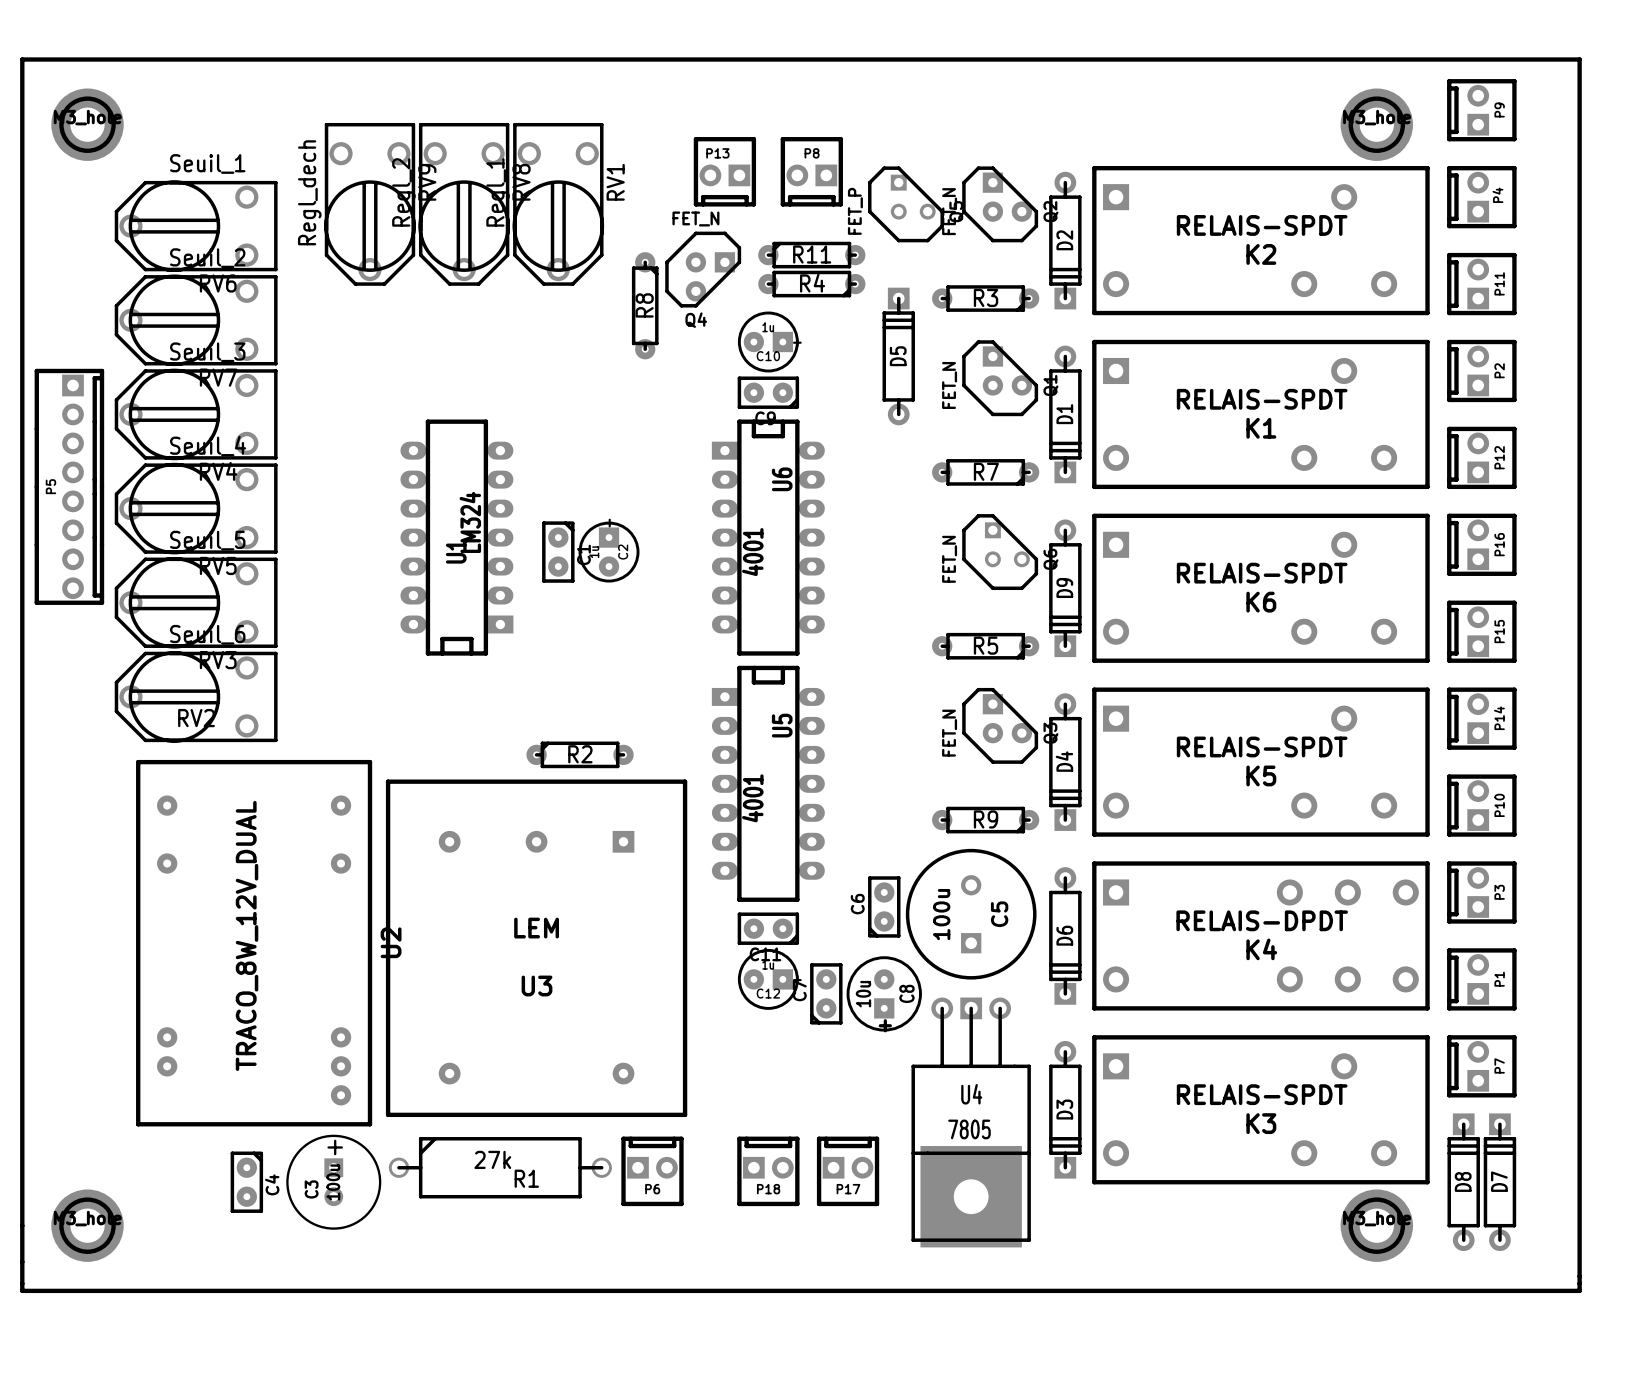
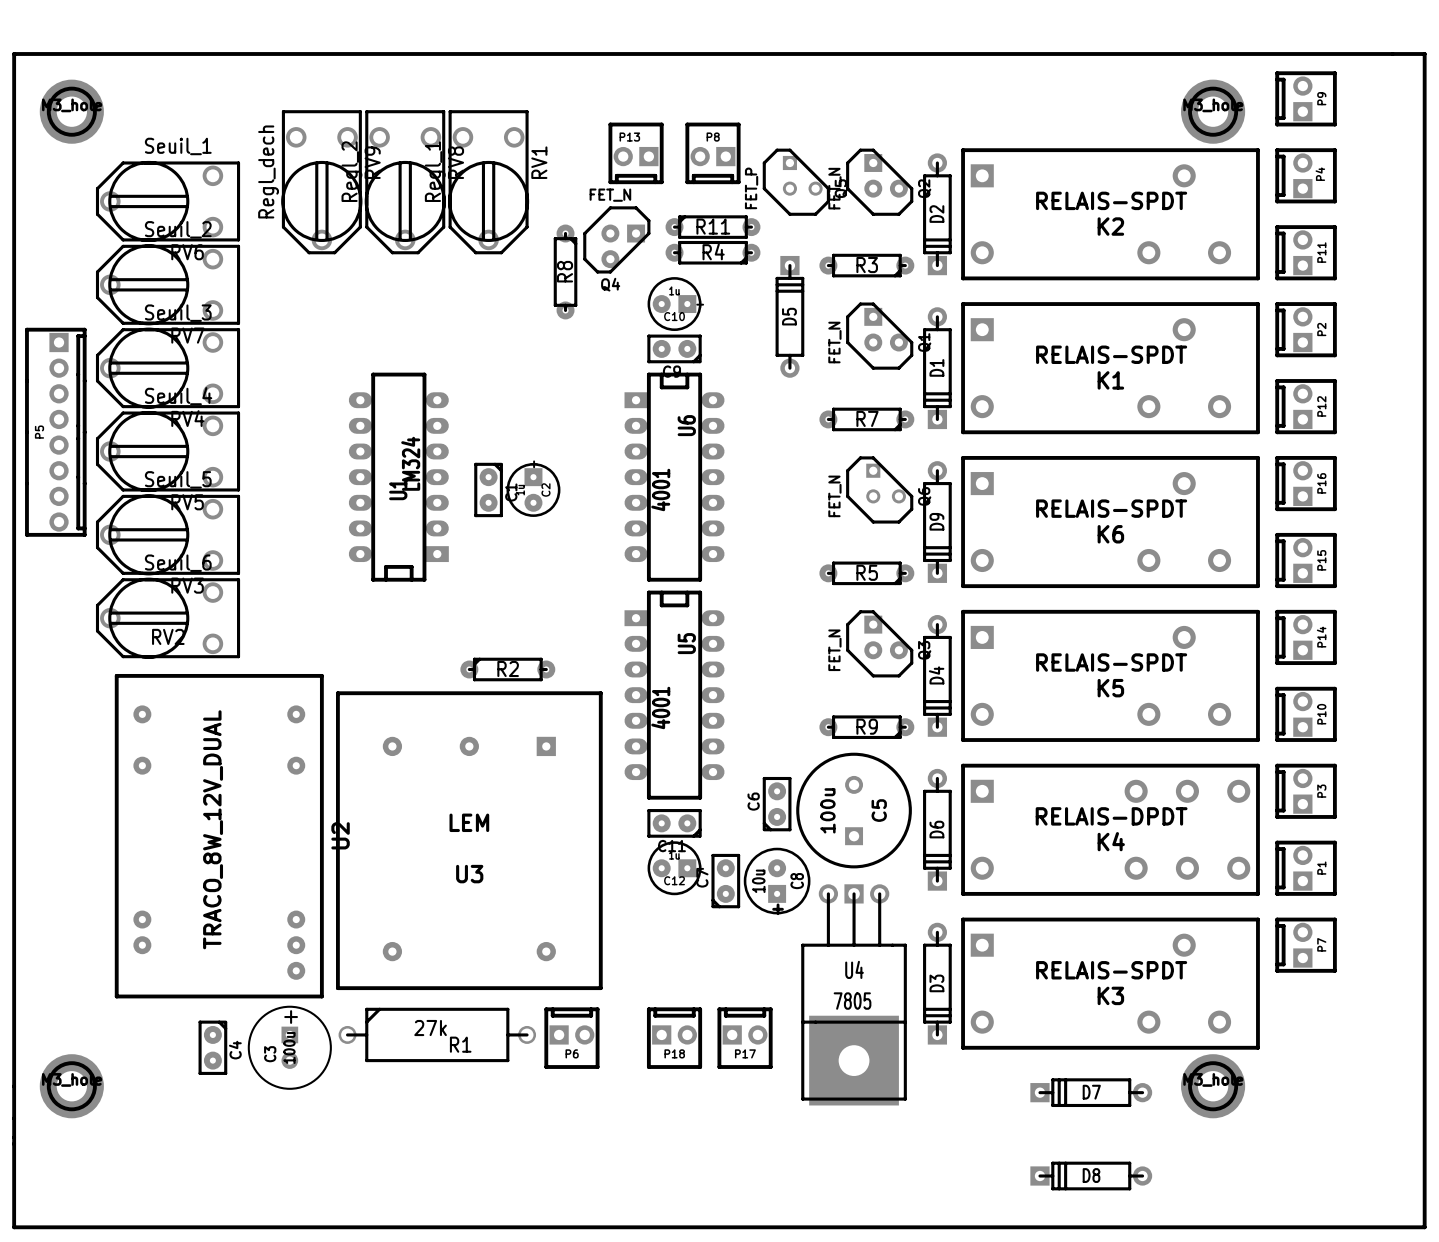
board edge: (1579, 59) (1579, 1290) (22, 1290) -> (1392, 53) (1424, 53) (1424, 1227) (14, 1227) (14, 1143)
D8 rotation: 0° (1463, 1182) -> 90° counterclockwise (1091, 1176)
D8 position: (1463, 1182) -> (1091, 1176)
D7 rotation: 0° (1499, 1182) -> 90° counterclockwise (1091, 1092)
D7 position: (1499, 1182) -> (1091, 1092)

